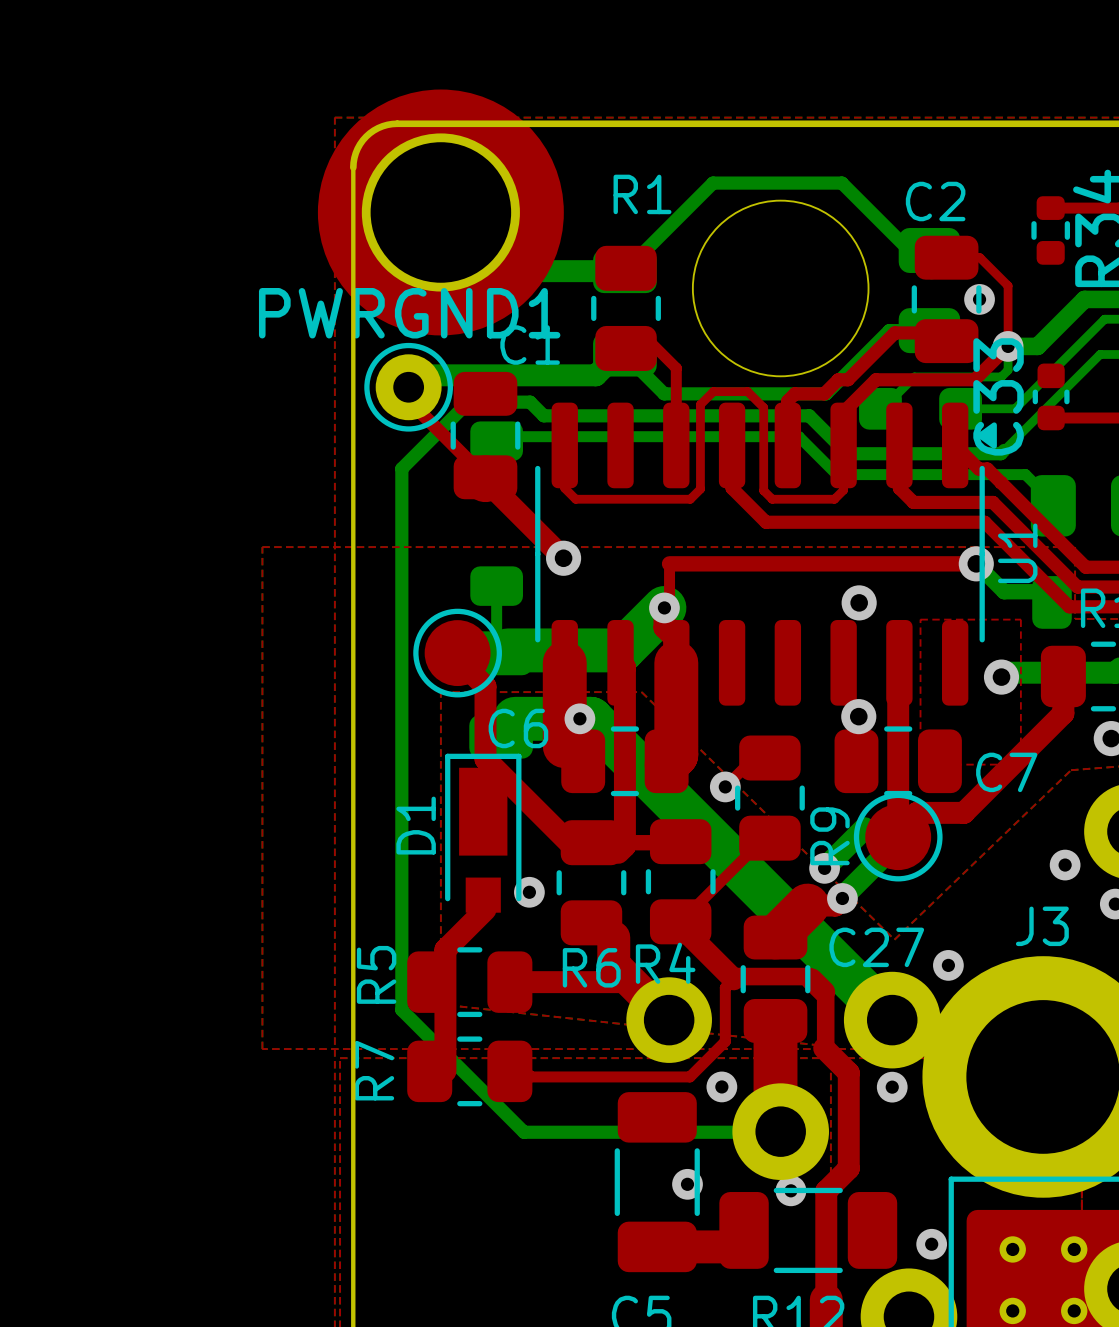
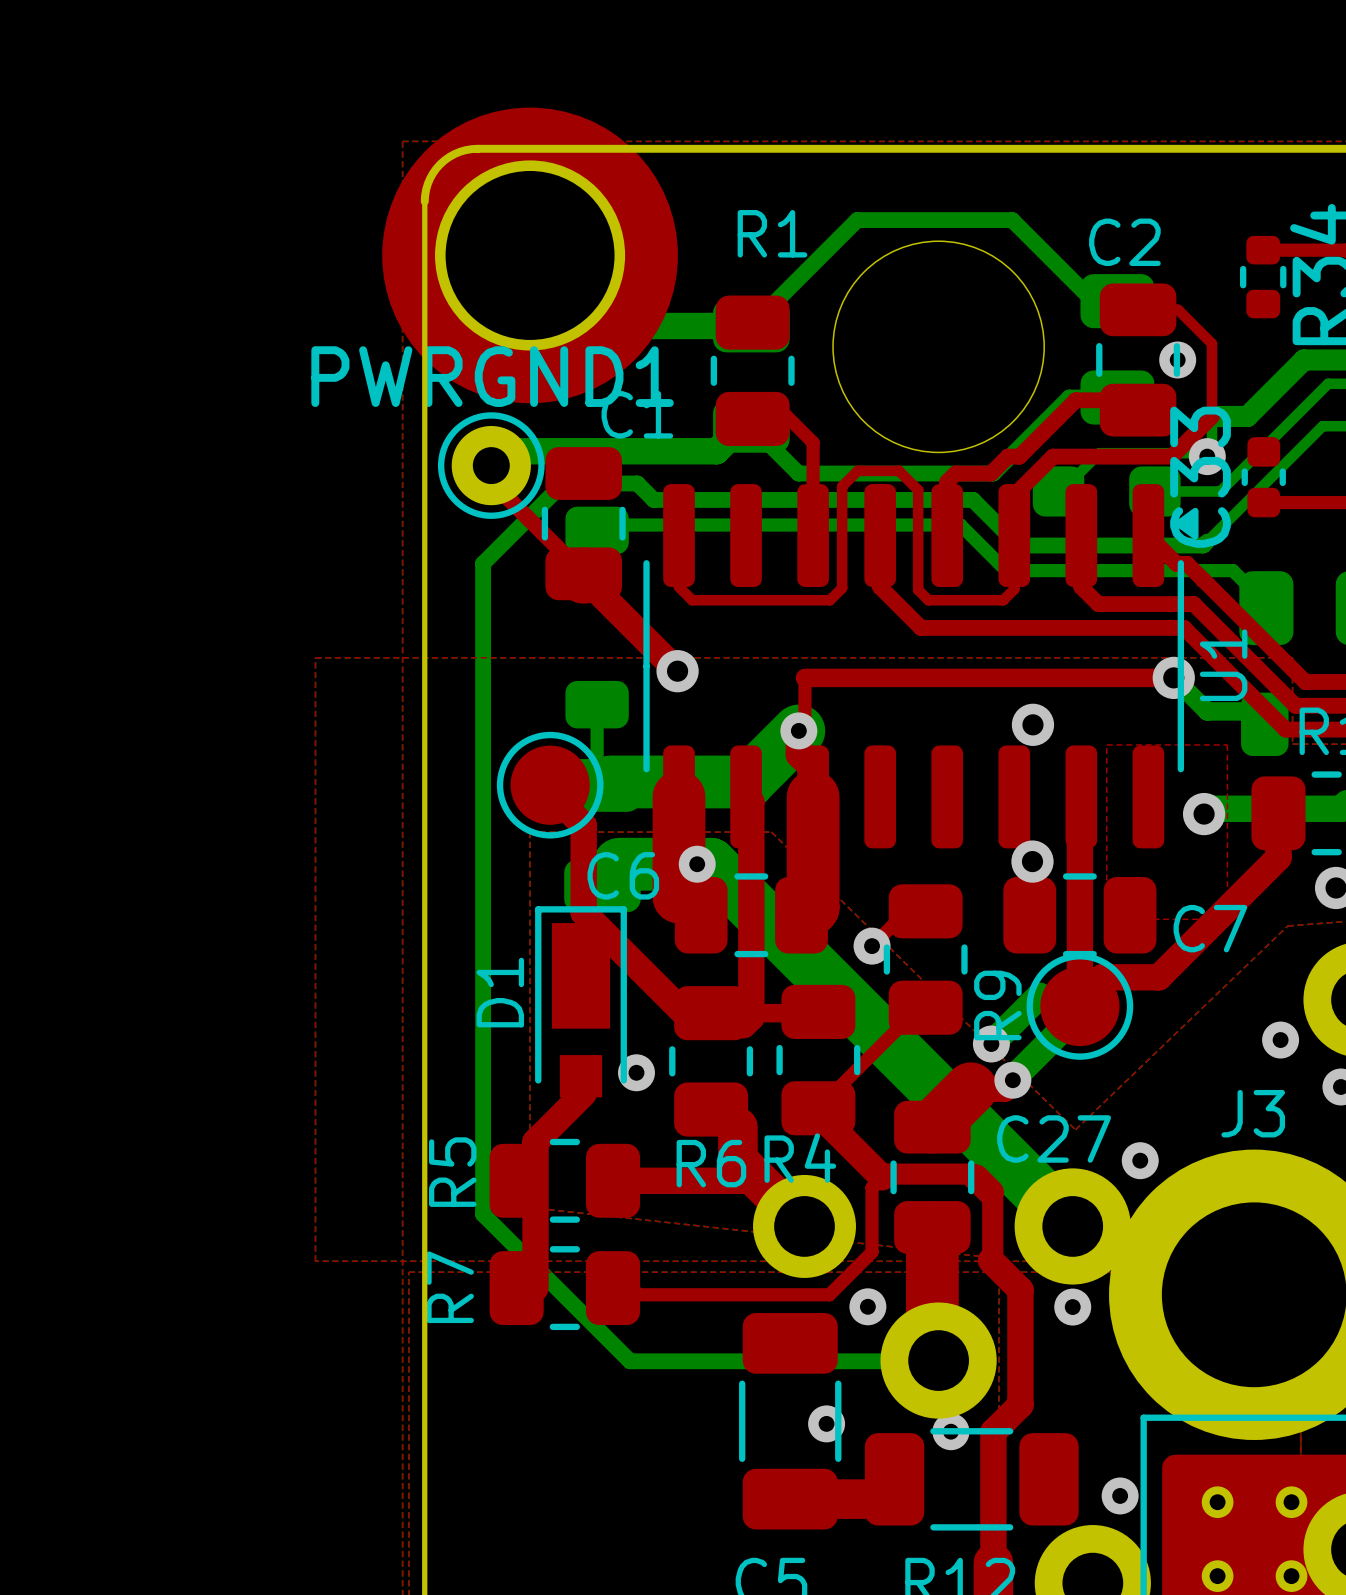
via position: (1008, 346) -> (1207, 456)

